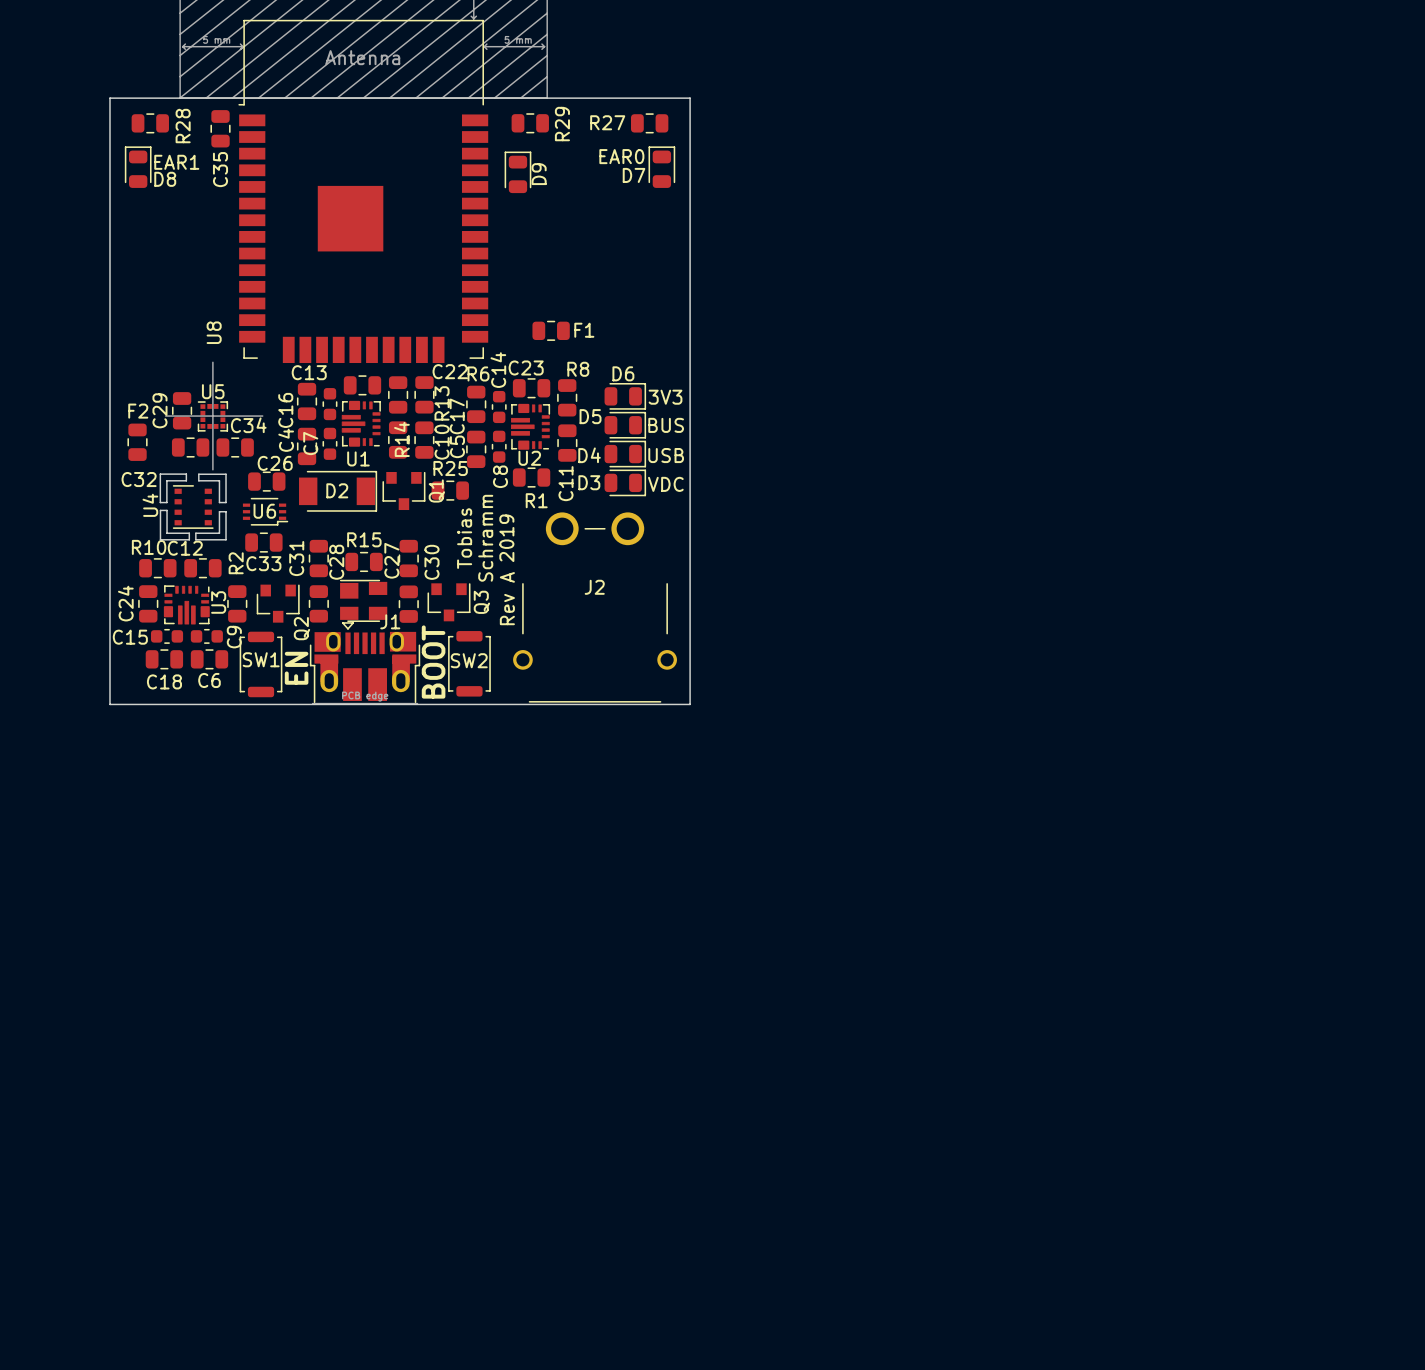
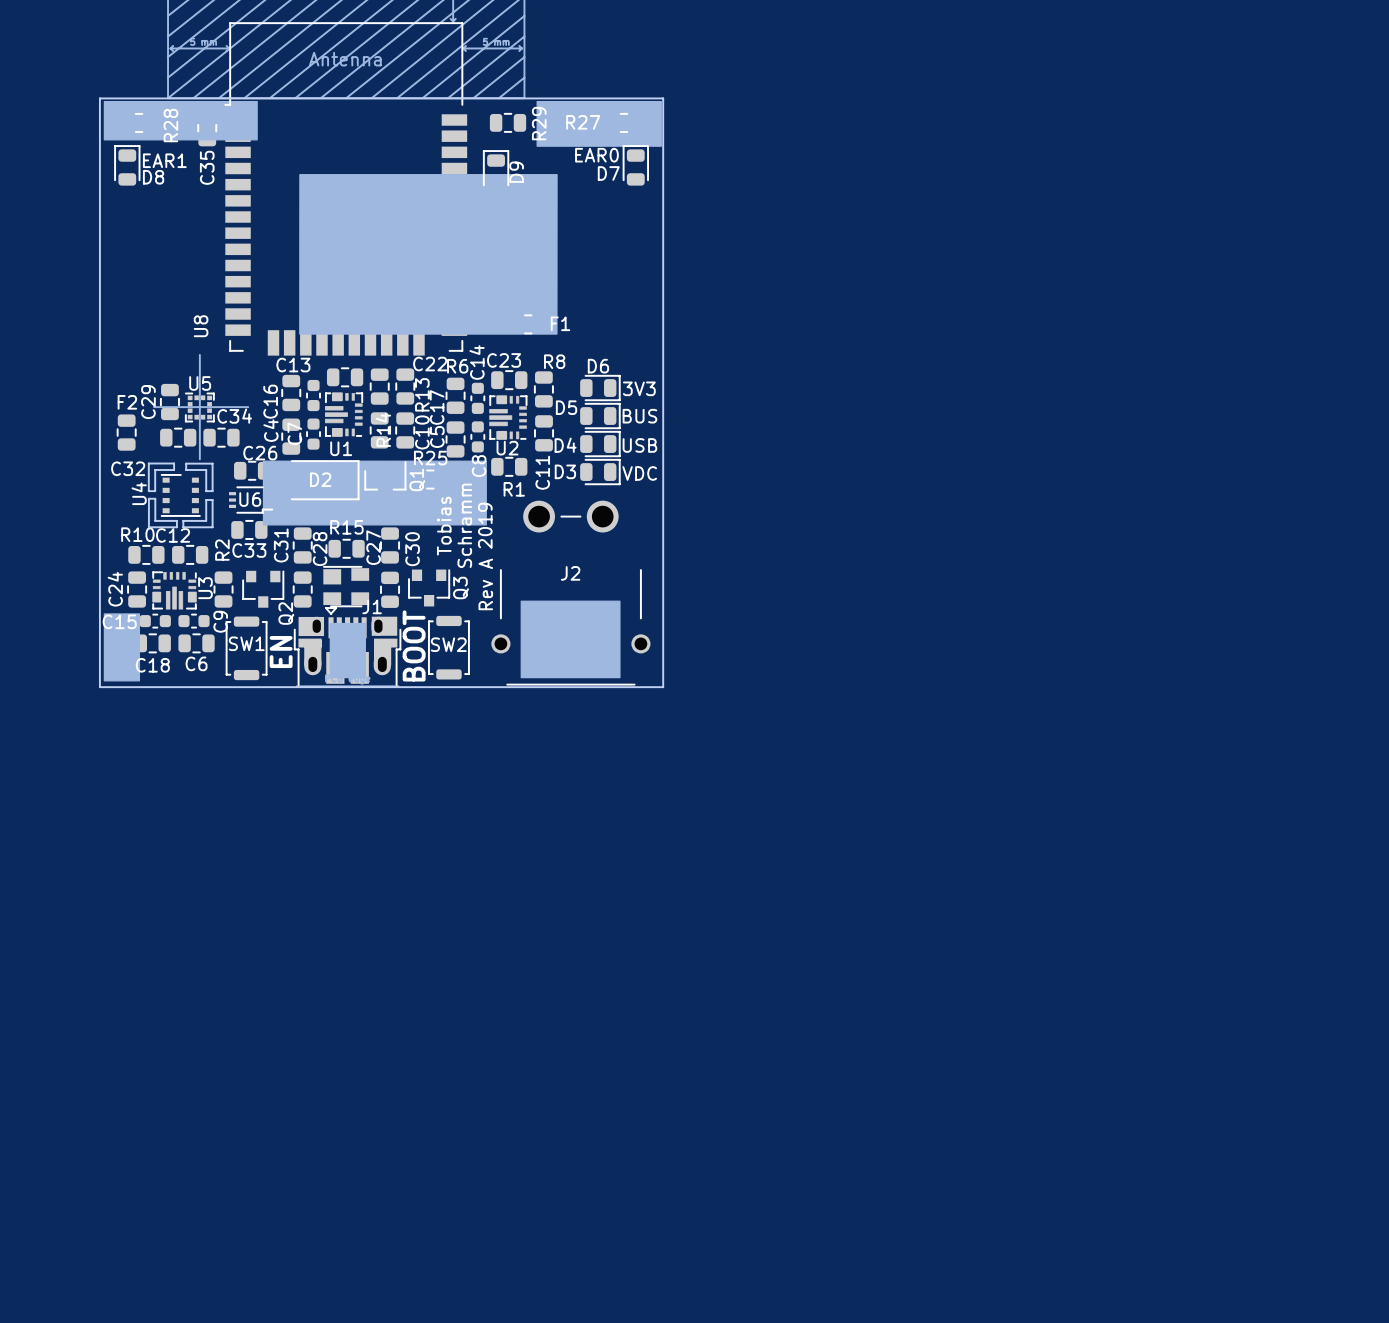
drawing: none -> [103, 100, 258, 141]
drawing: none -> [536, 100, 662, 147]
drawing: none -> [299, 174, 558, 335]
drawing: none -> [262, 460, 487, 526]
drawing: none -> [520, 600, 621, 679]
drawing: none -> [103, 613, 141, 682]
drawing: none -> [329, 622, 366, 679]

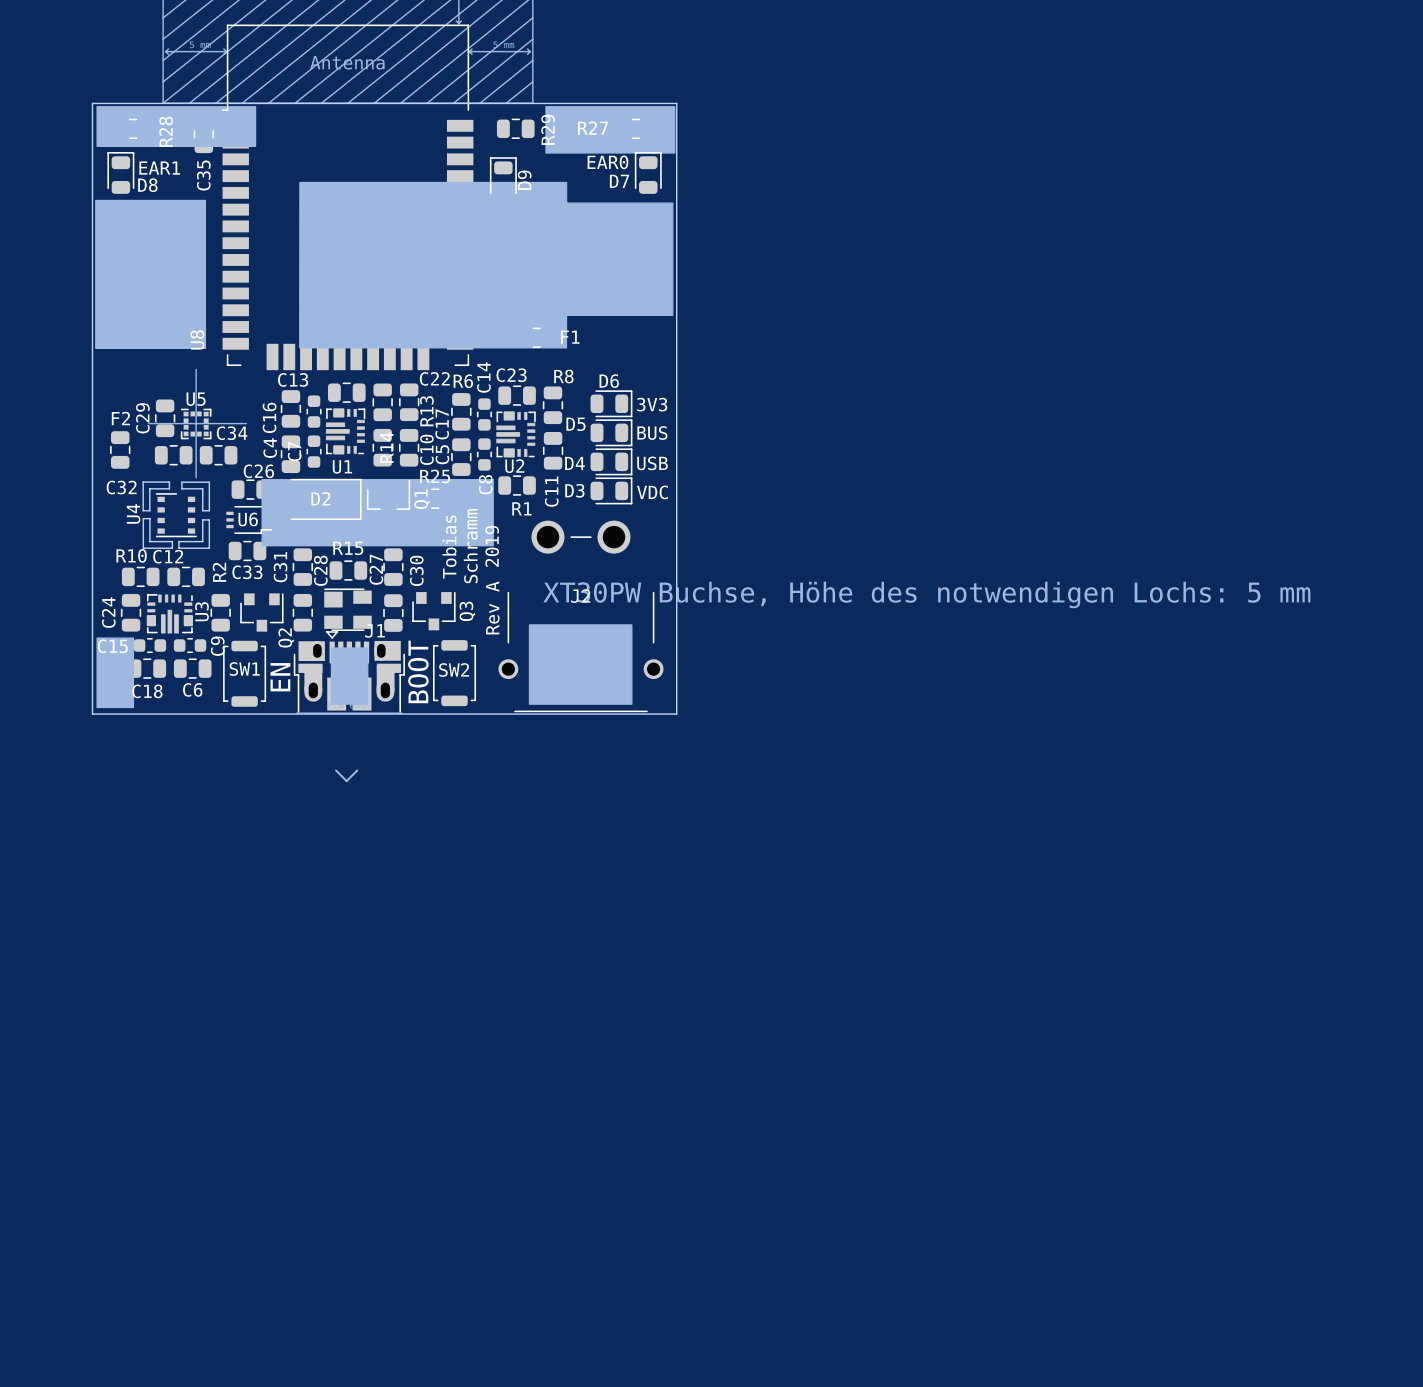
drawing: none -> [95, 199, 207, 350]
drawing: none -> [504, 202, 674, 316]
text: none -> XT30PW Buchse, Höhe des notwendigen Lochs: 5 mm (926, 595)
line: none -> (336, 770) (346, 781) (357, 770)

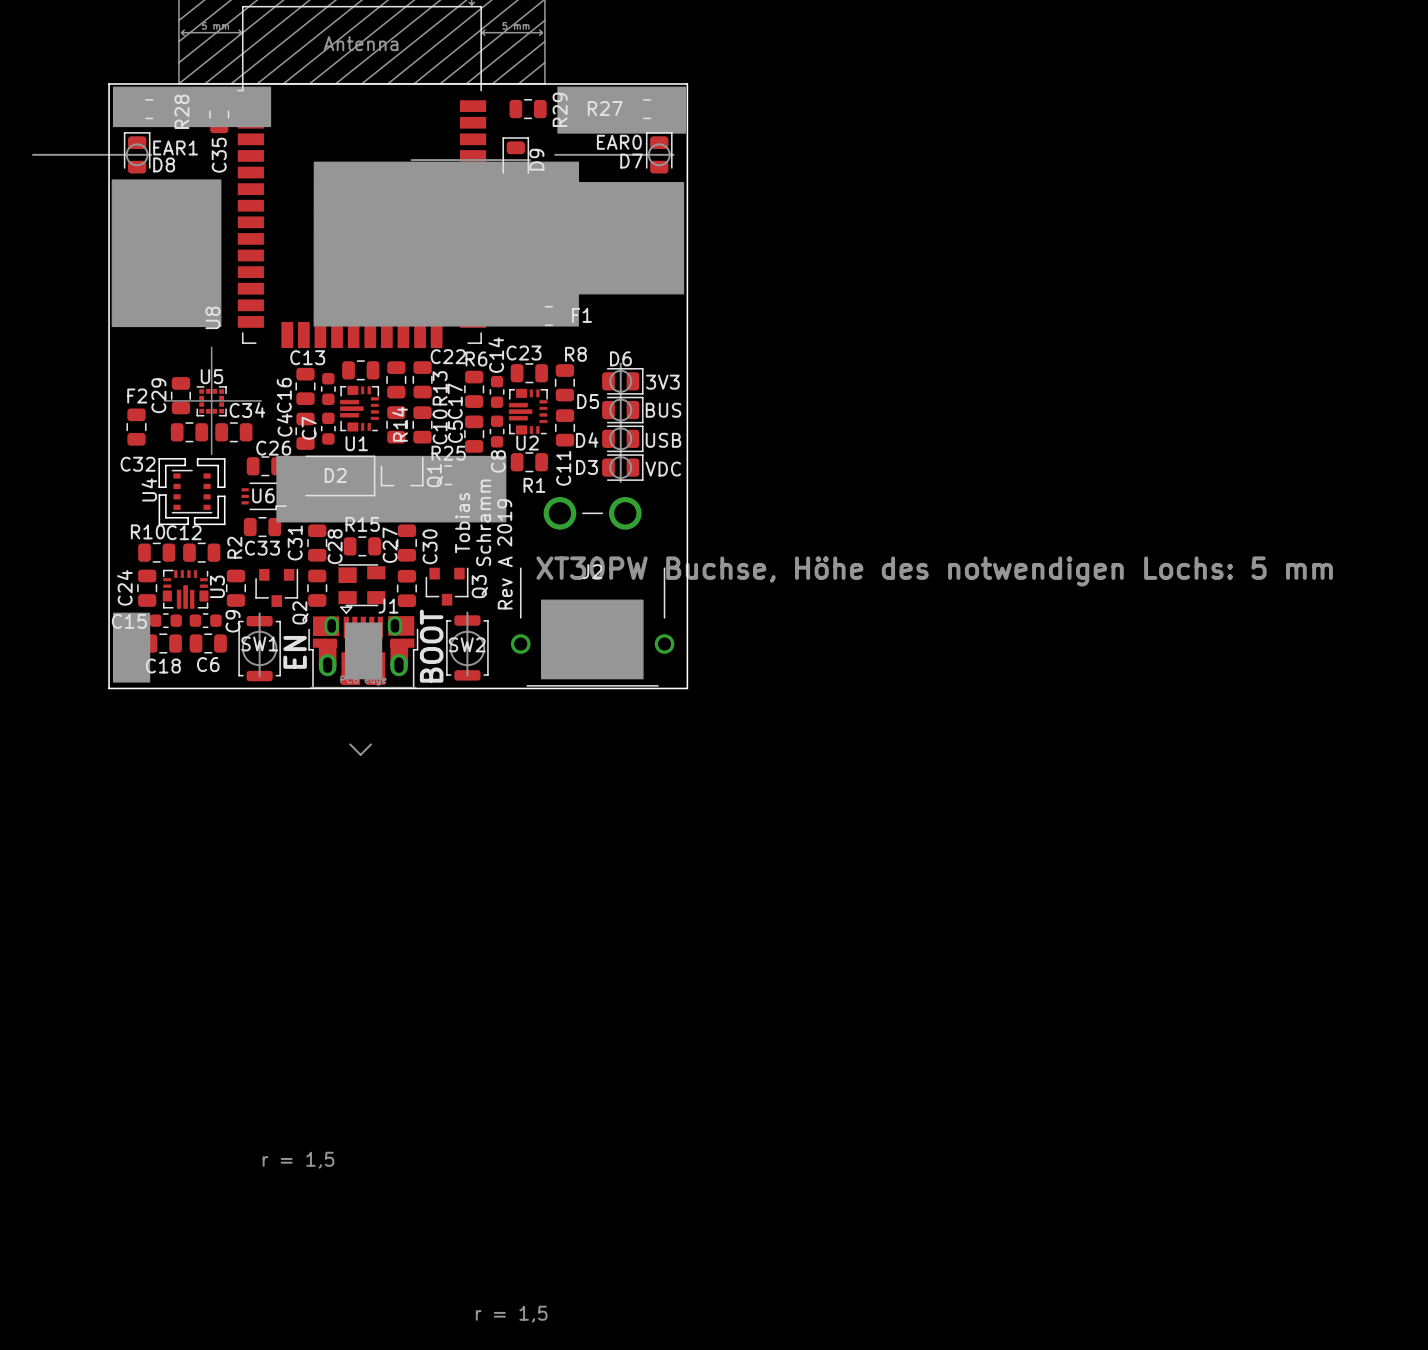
drawing: none -> [125, 143, 149, 167]
drawing: none -> [647, 143, 671, 167]
line: none -> (32, 154) (151, 154)
line: none -> (555, 154) (673, 154)
line: none -> (411, 160) (530, 160)
line: none -> (620, 363) (620, 481)
drawing: none -> [609, 369, 633, 480]
line: none -> (467, 612) (467, 675)
line: none -> (259, 613) (259, 676)
drawing: none -> [241, 630, 278, 667]
drawing: none -> [449, 630, 486, 667]
text: none -> r = 1,5 (298, 1160)
text: none -> r = 1,5 (511, 1314)

